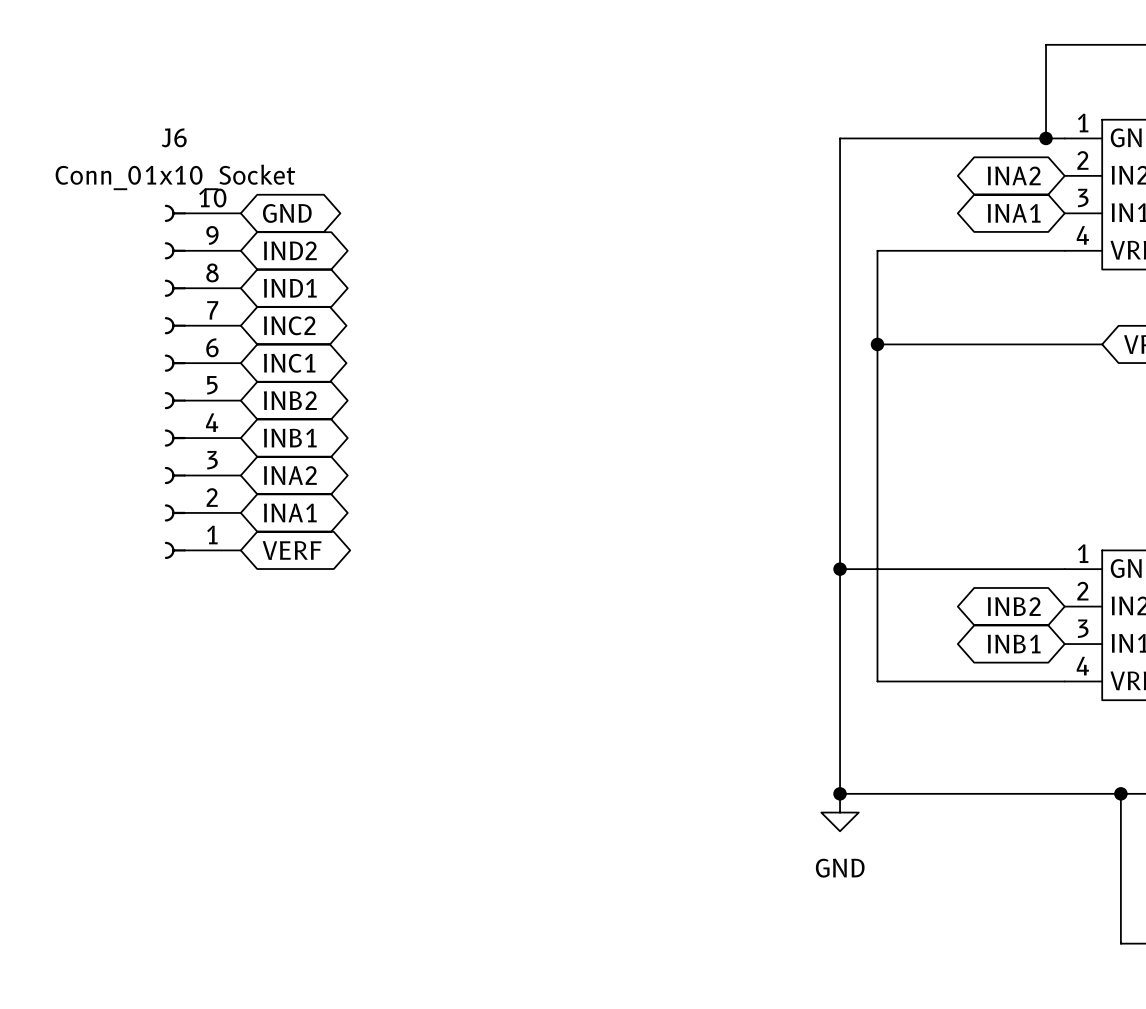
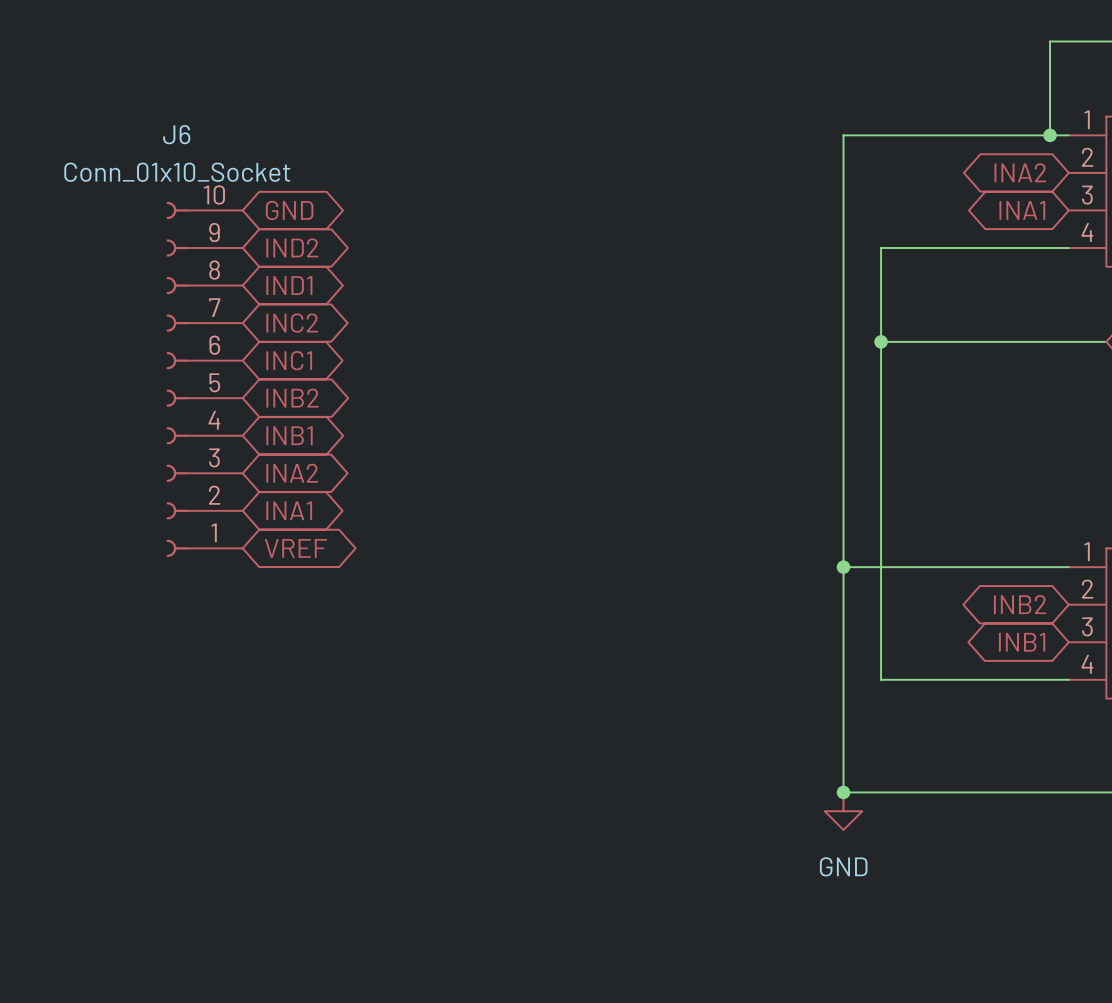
global label: VERF (292, 550) -> VREF (295, 548)

